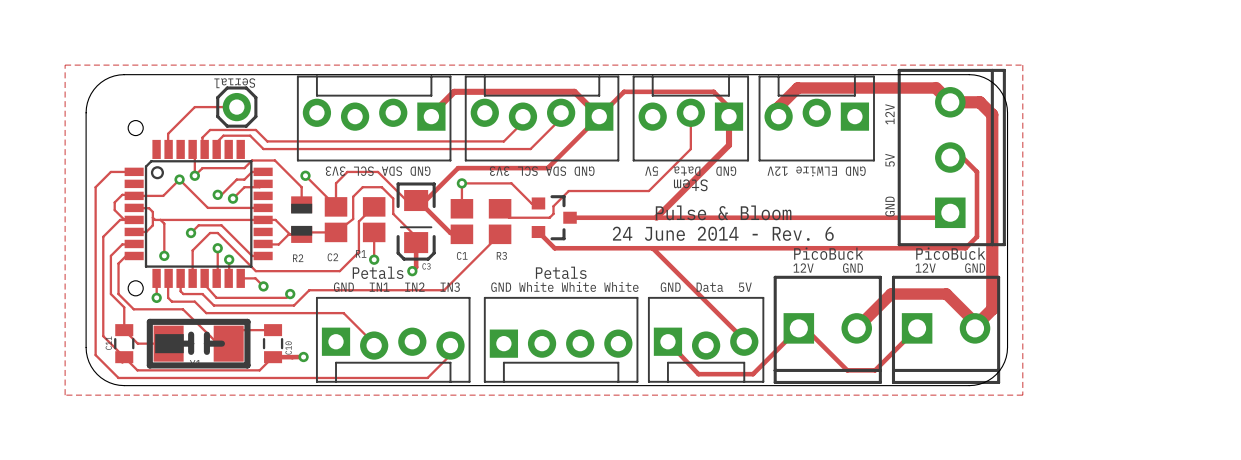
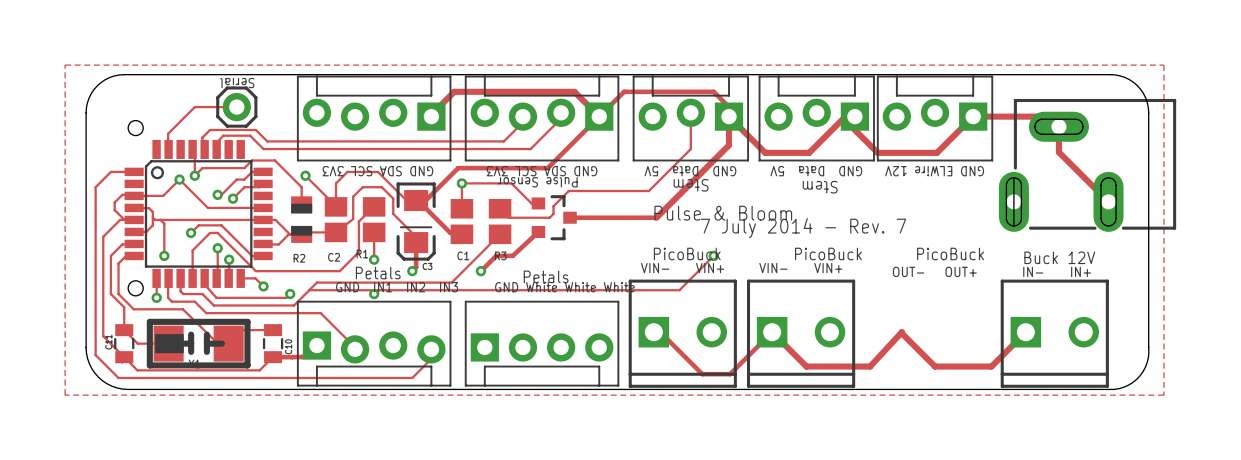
zone outline: (1022, 65) (1022, 395) -> (1022, 65) (1163, 65) (1163, 395) (1022, 395)
board edge: (969, 74) (983, 77) (996, 85) (1004, 98) (1007, 112) (1007, 352) (1004, 362) (996, 374) (979, 384) (124, 385) (109, 382) (97, 374) (89, 362) (86, 347) -> (969, 74) (1115, 74) (1133, 82) (1143, 93) (1148, 112) (1148, 352) (1143, 371) (1128, 385) (1114, 389) (128, 389) (112, 386) (98, 377) (89, 363) (86, 347)
track: none -> (729, 116) (765, 152) (809, 152) (845, 116) (851, 116) (851, 126) (877, 152) (936, 152) (973, 116) (1048, 116) (1058, 126) (1058, 152) (1108, 201)
track: (778, 116) (778, 107) (797, 88) (936, 88) (950, 102) (979, 102) (992, 114) (992, 309) (973, 328) -> none
track: (950, 157) (962, 157) (977, 171) (977, 236) (965, 248) (554, 248) (538, 232) -> (481, 271) (496, 255) (512, 255) (538, 232)
part: (951, 157) -> none
text: GND 5V 12V (890, 160) -> none
part: none -> (1087, 165)
text: GND ELWire 12V (816, 171) -> GND Data 5V (816, 171)
text: none -> GND ELWire 12V (934, 171)
part value: none -> Pulse Sensor (537, 182)
part value: none -> Stem (820, 187)
track: (950, 212) (945, 217) (656, 217) -> none
text: 24 June 2014 - Rev. 6 (723, 233) -> 7 July 2014 - Rev. 7 (803, 228)
track: (652, 248) (744, 341) -> none
text: none -> PicoBuck (687, 253)
track: none -> (713, 255) (679, 290) (444, 290)
via: none -> (713, 255)
text: none -> VIN- VIN+ (682, 268)
text: none -> VIN- VIN+ (800, 268)
text: 12V GND (828, 268) -> none
text: 12V GND (950, 268) -> none
via: none -> (481, 271)
text: none -> OUT- OUT+ (934, 271)
text: none -> IN- IN+ (1057, 271)
text position: Petals (561, 272) -> Petals (546, 276)
track: (451, 282) (444, 290) -> (451, 282) (316, 282) (309, 290)
text: GND Data 5V (706, 287) -> none
via: none -> (374, 294)
track: (320, 313) (343, 313) (374, 345) -> (320, 313) (355, 349)
track: (856, 328) (891, 294) (946, 294) (973, 320) (973, 328) -> none
track: (917, 328) (875, 370) (847, 370) (805, 328) (798, 328) (753, 374) (730, 374) -> (1025, 332) (991, 366) (935, 366) (901, 332) (870, 366) (806, 366) (772, 332) (730, 374)
part position: (827, 329) -> (801, 333)
part: (946, 329) -> none
part: none -> (682, 333)
part: none -> Buck 12V (1054, 333)
part position: (393, 339) -> (374, 343)
part position: (561, 339) -> (542, 343)
part rotation: 0° (706, 339) -> 180° (935, 118)
part position: (706, 339) -> (935, 118)
track: (667, 341) (698, 374) (702, 374) -> (653, 332) (660, 332) (702, 374)
track: (450, 345) (450, 355) (427, 377) (412, 377) -> (431, 349) (431, 358) (412, 377)
via: (303, 357) -> none

